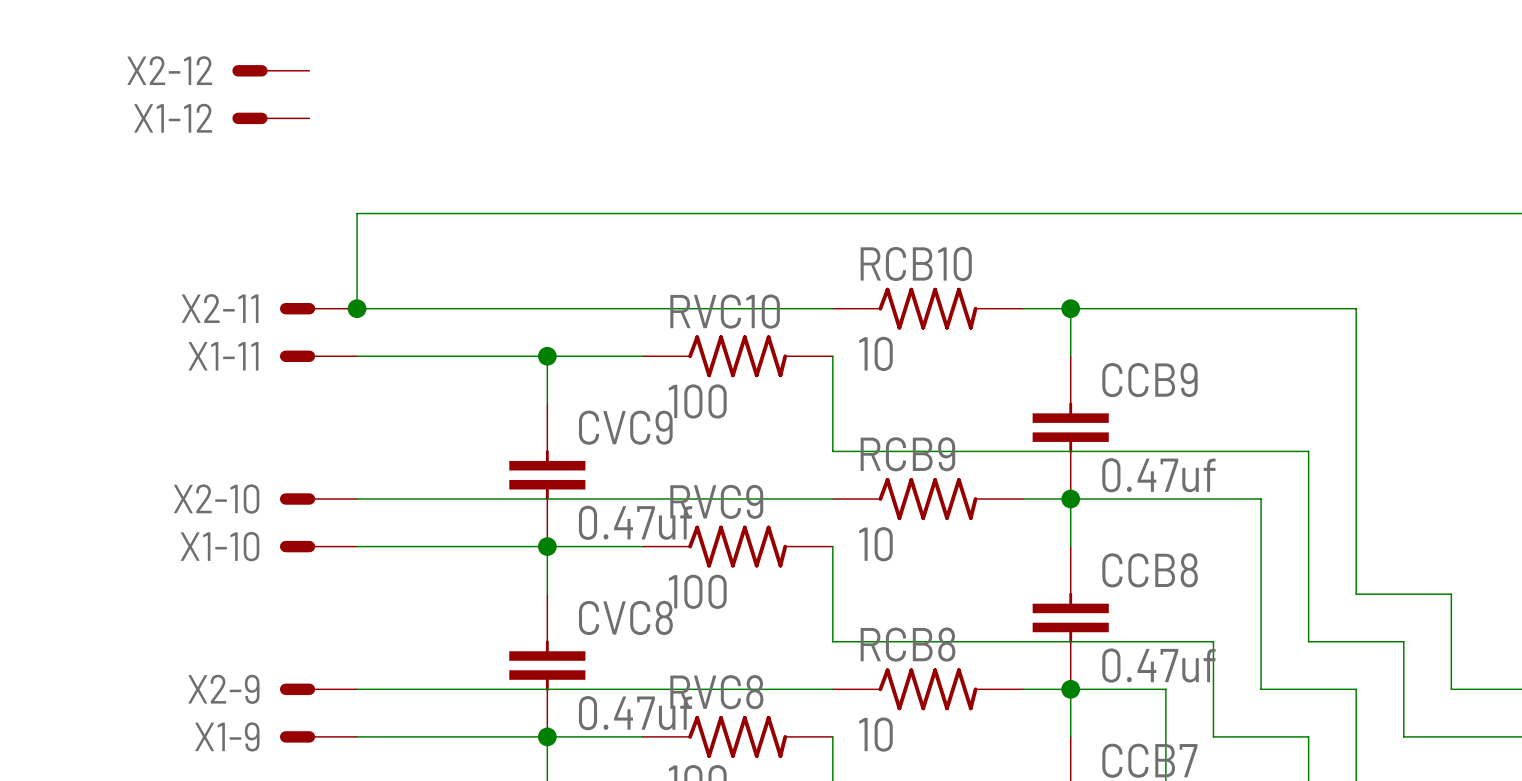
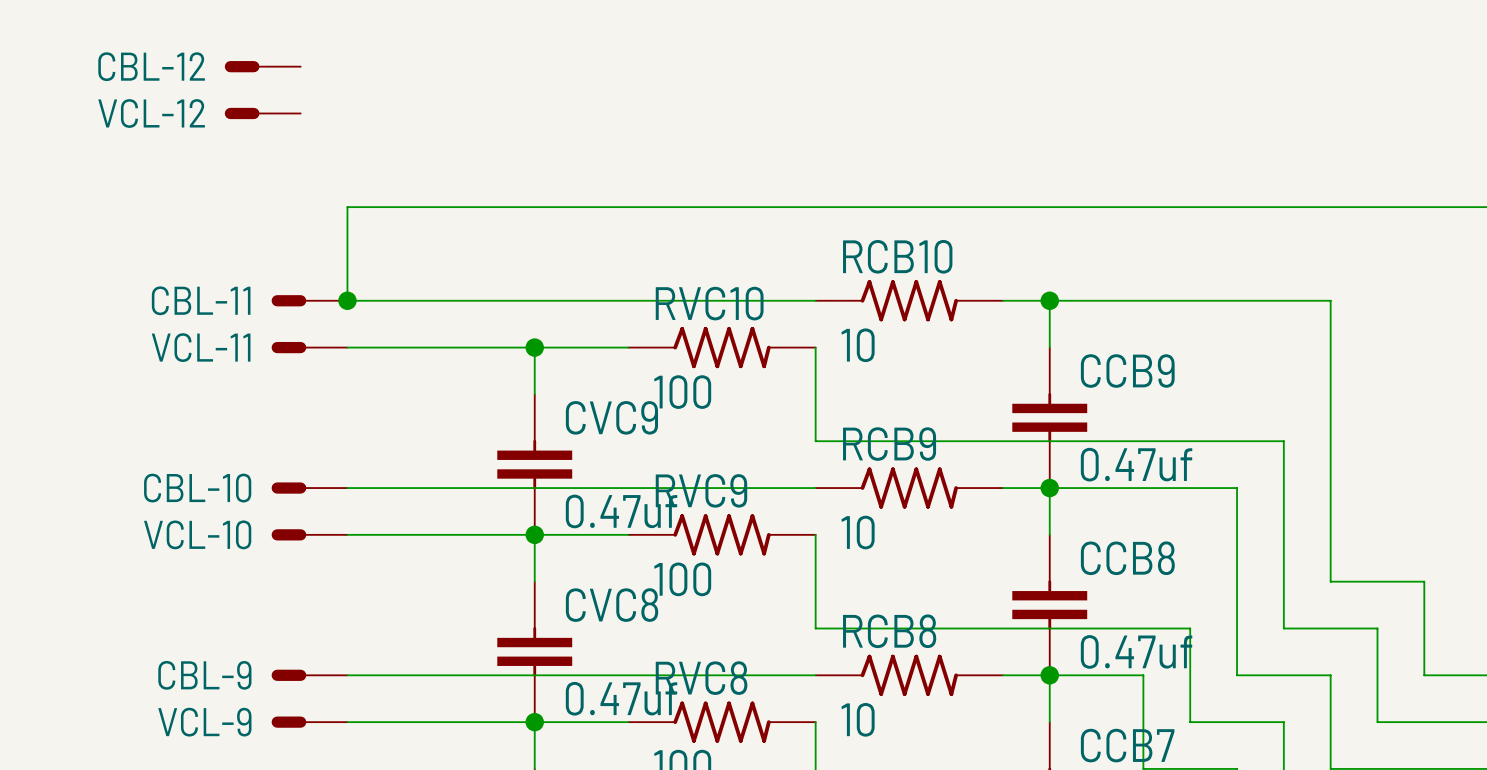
X2-12 name: X2-12 (169, 70) -> CBL-12 (151, 66)
X1-12 name: X1-12 (173, 118) -> VCL-12 (151, 113)
X2-11 name: X2-11 (220, 308) -> CBL-11 (201, 300)
X1-11 name: X1-11 (223, 356) -> VCL-11 (201, 347)
X2-10 name: X2-10 (216, 499) -> CBL-10 (197, 488)
X1-10 name: X1-10 (220, 546) -> VCL-10 (197, 534)
X2-9 name: X2-9 (223, 689) -> CBL-9 (204, 675)
X1-9 name: X1-9 (227, 736) -> VCL-9 (204, 722)

